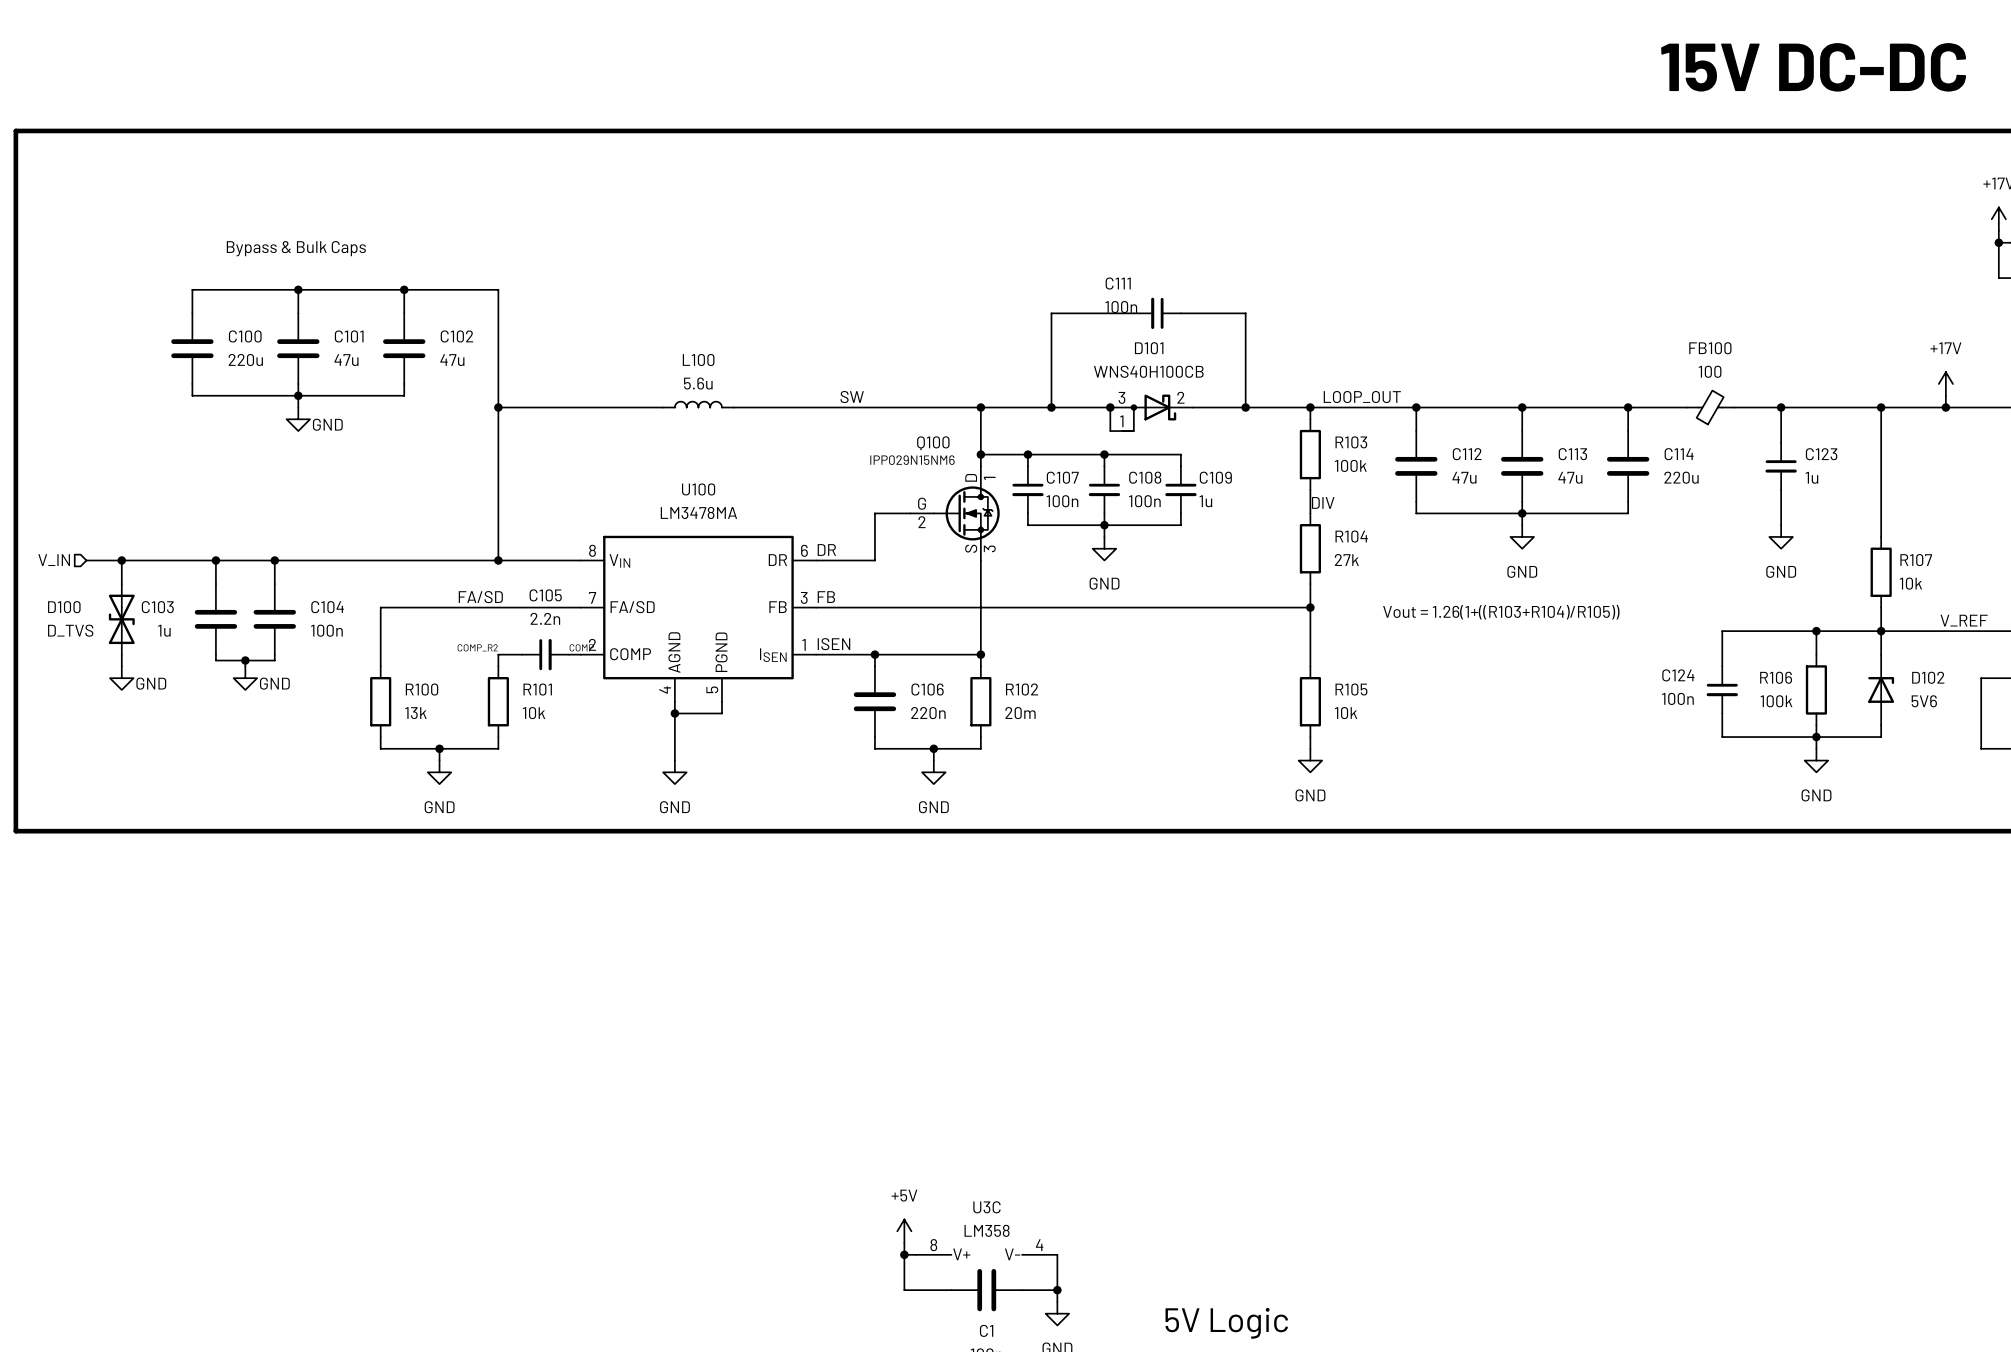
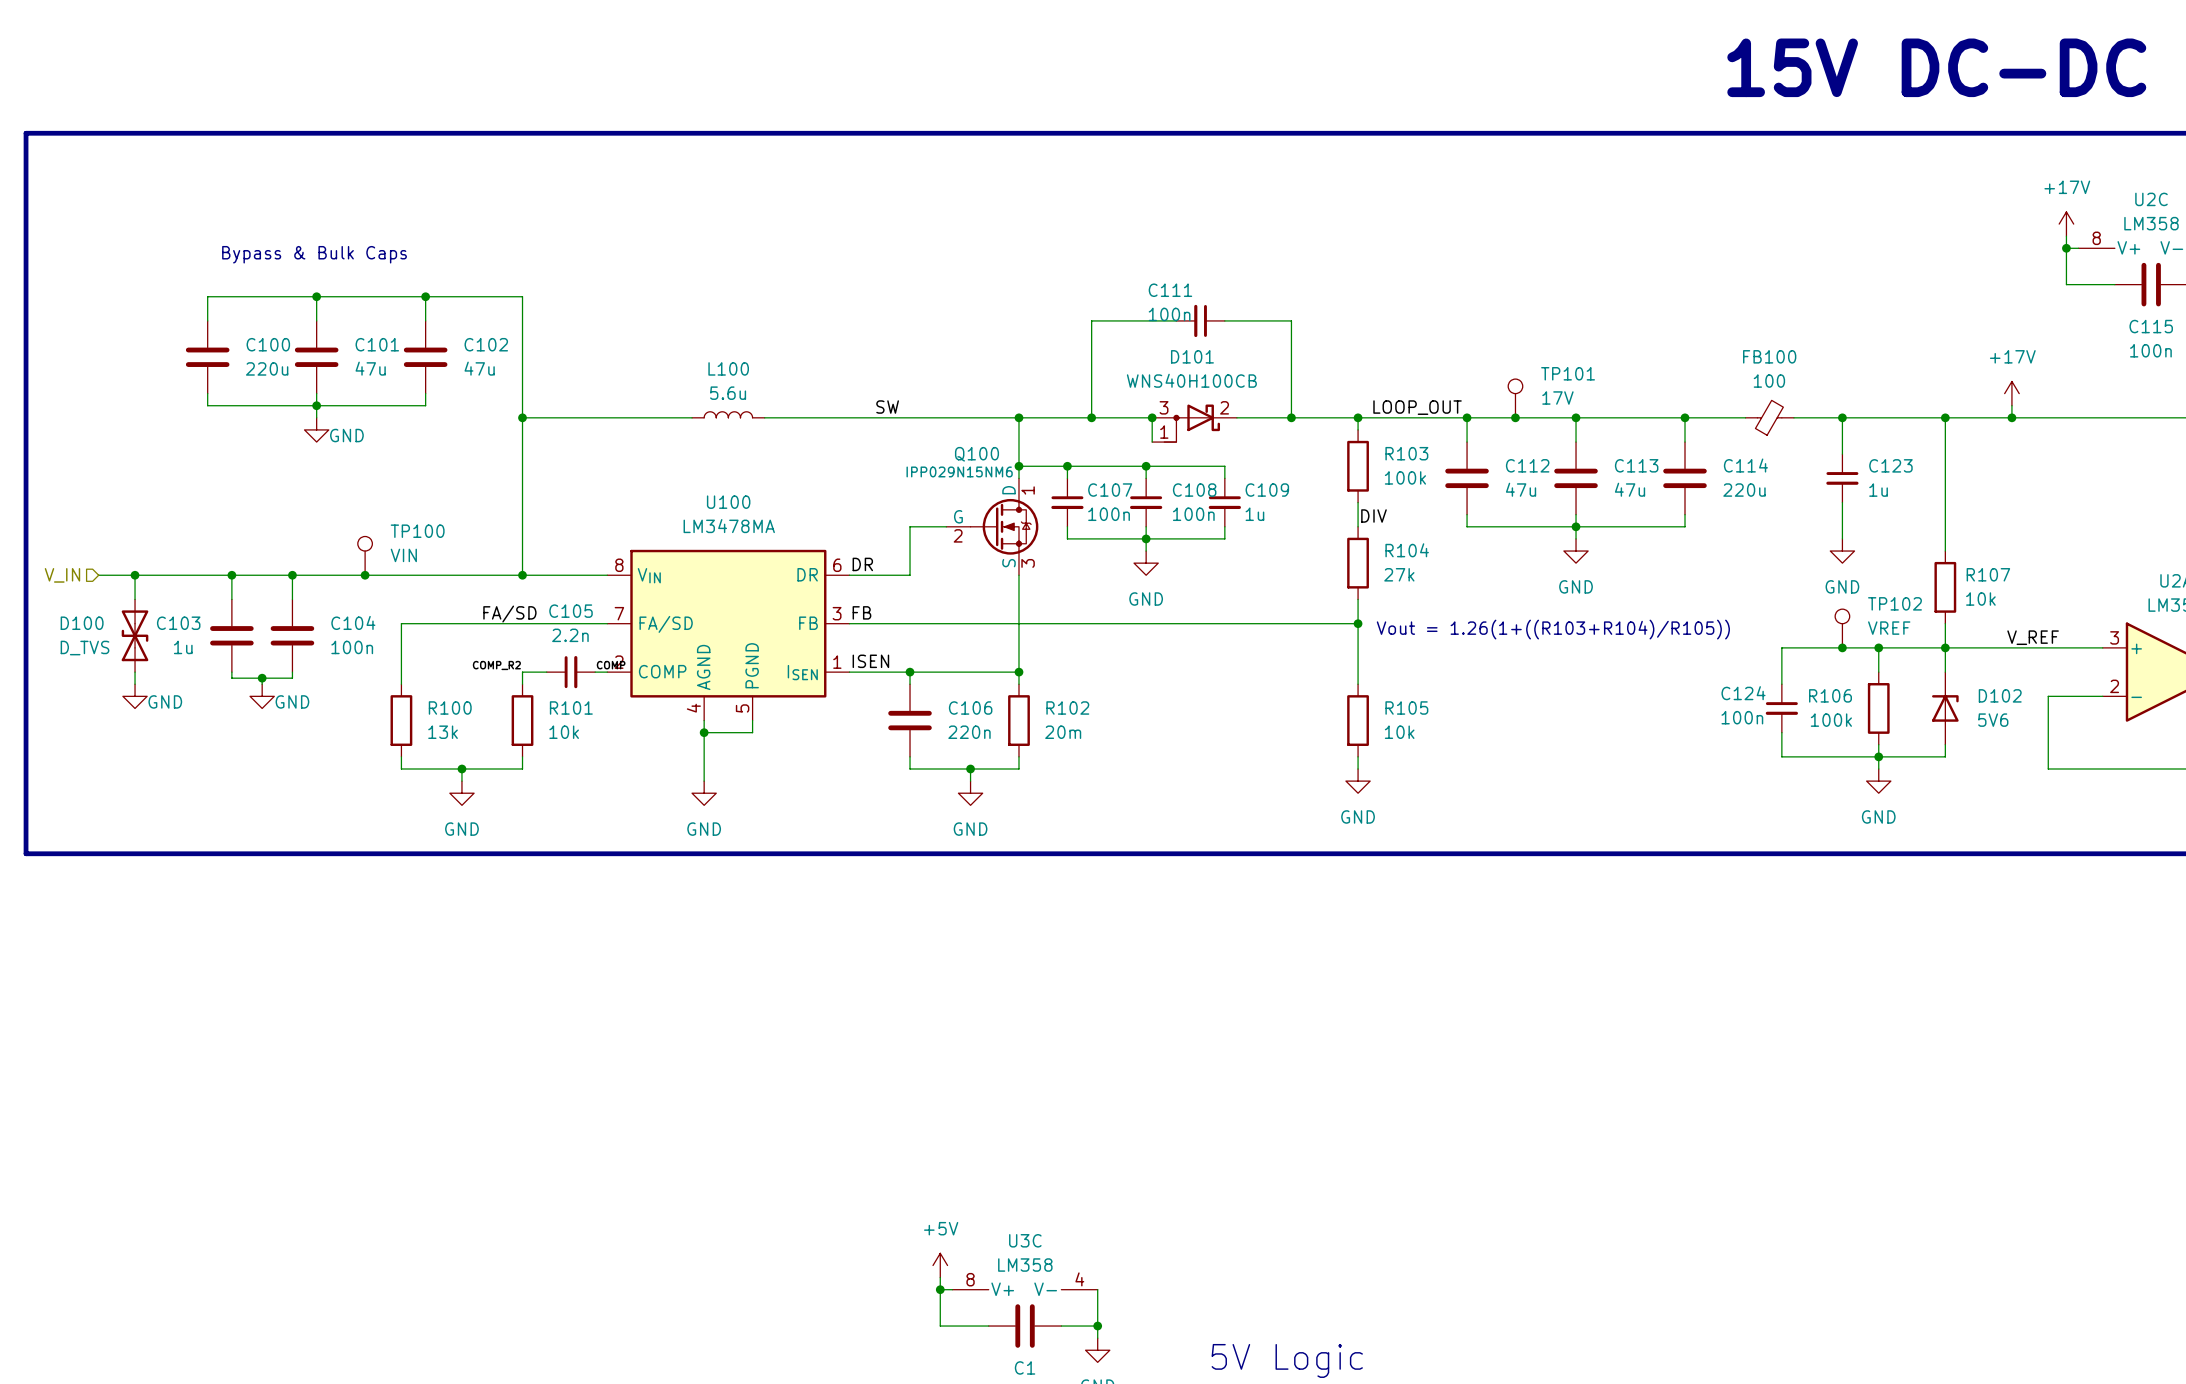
TP101: none -> 17V (1515, 398)
junction: none -> (1515, 417)
TP100: none -> VIN (365, 555)
junction: none -> (365, 575)
TP102: none -> VREF (1842, 628)
junction: none -> (1842, 647)

